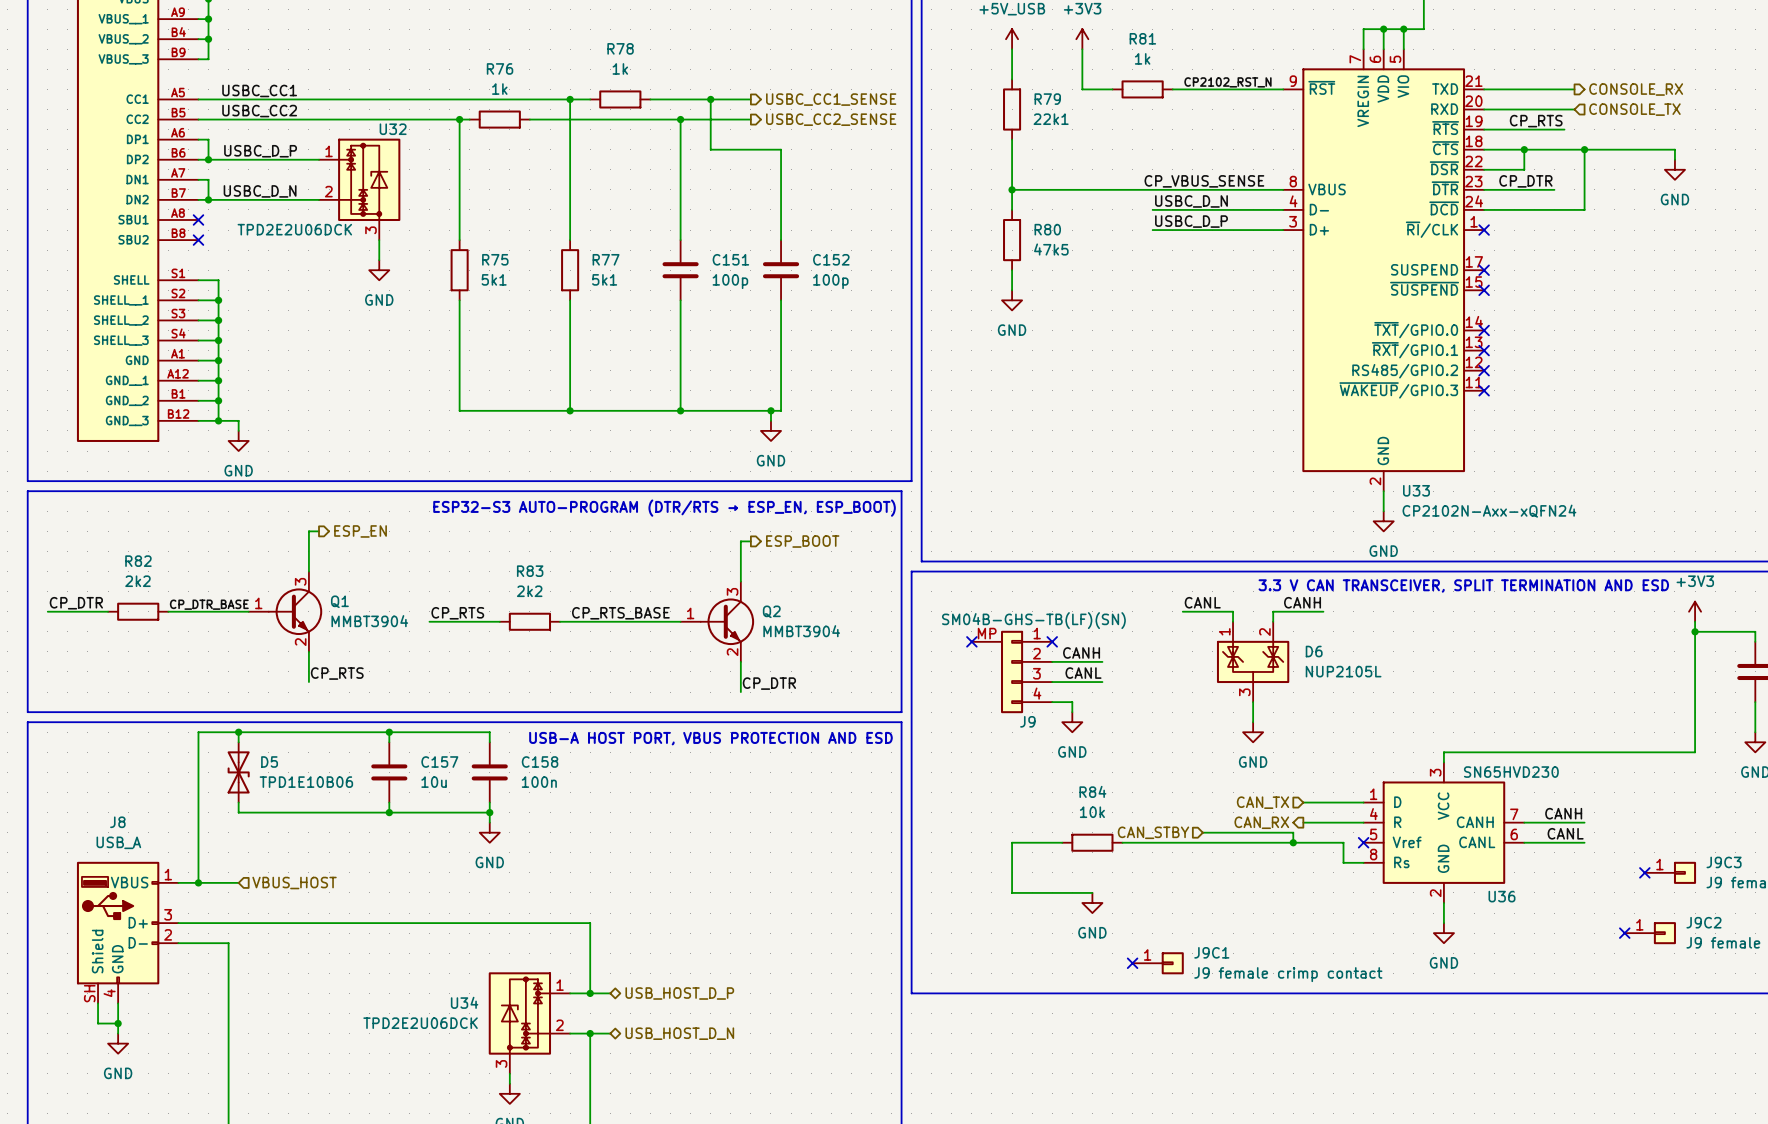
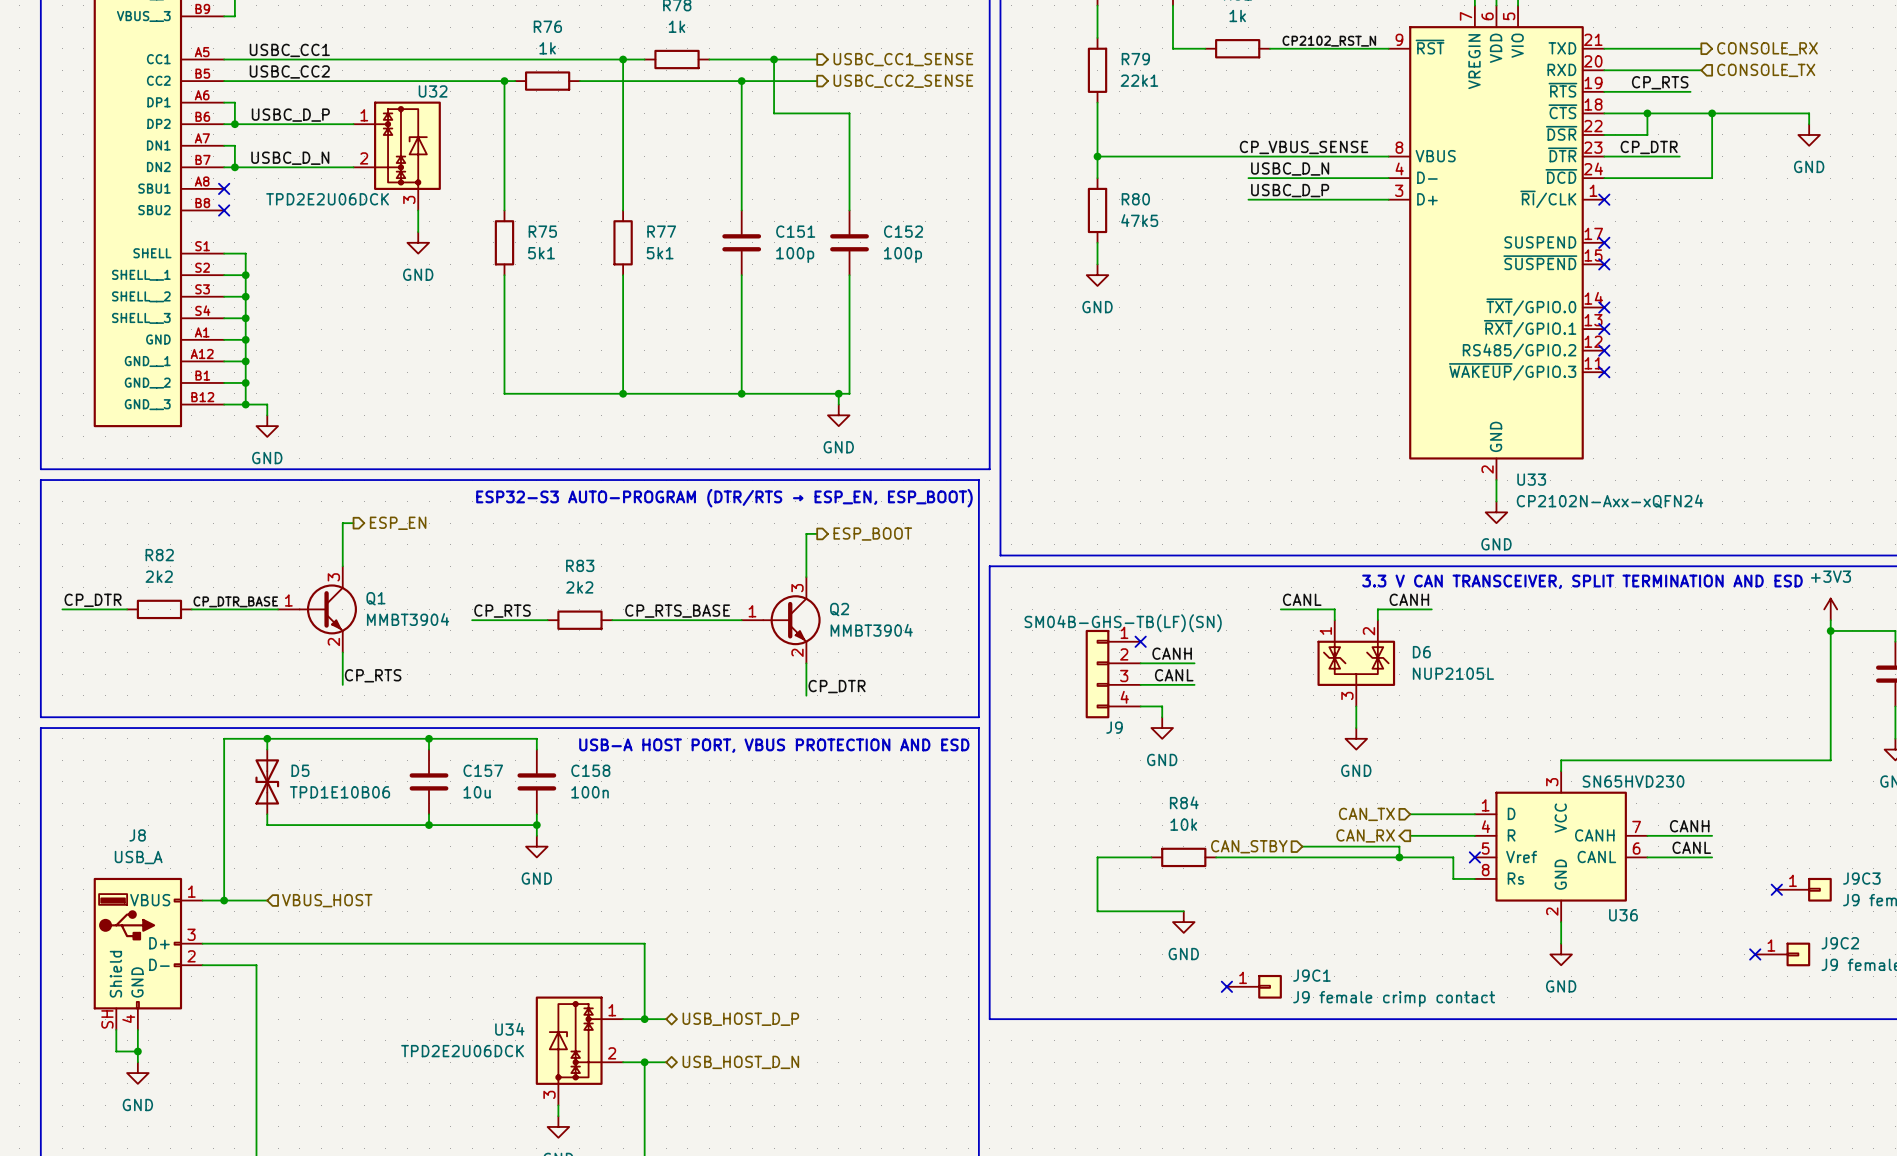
J9 symbol: [971, 630, 1053, 714] -> [1085, 629, 1141, 719]
no-connect mark: (971, 641) -> none

